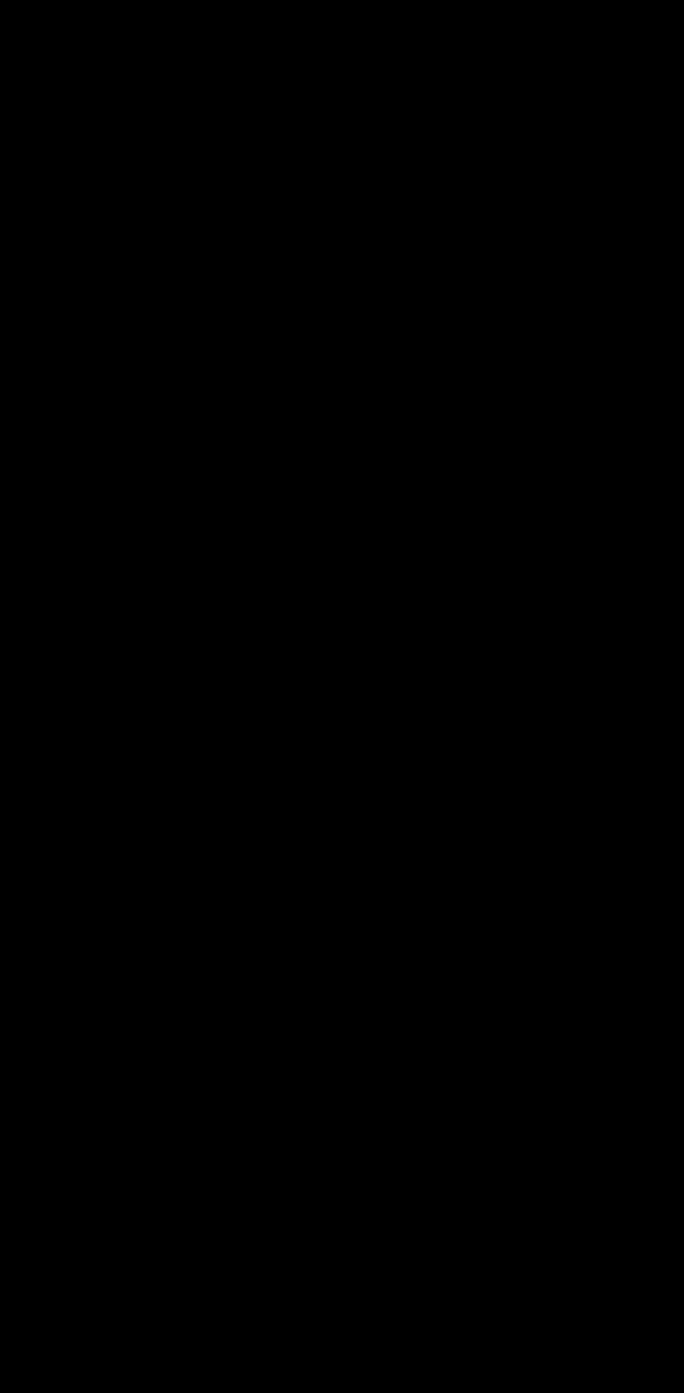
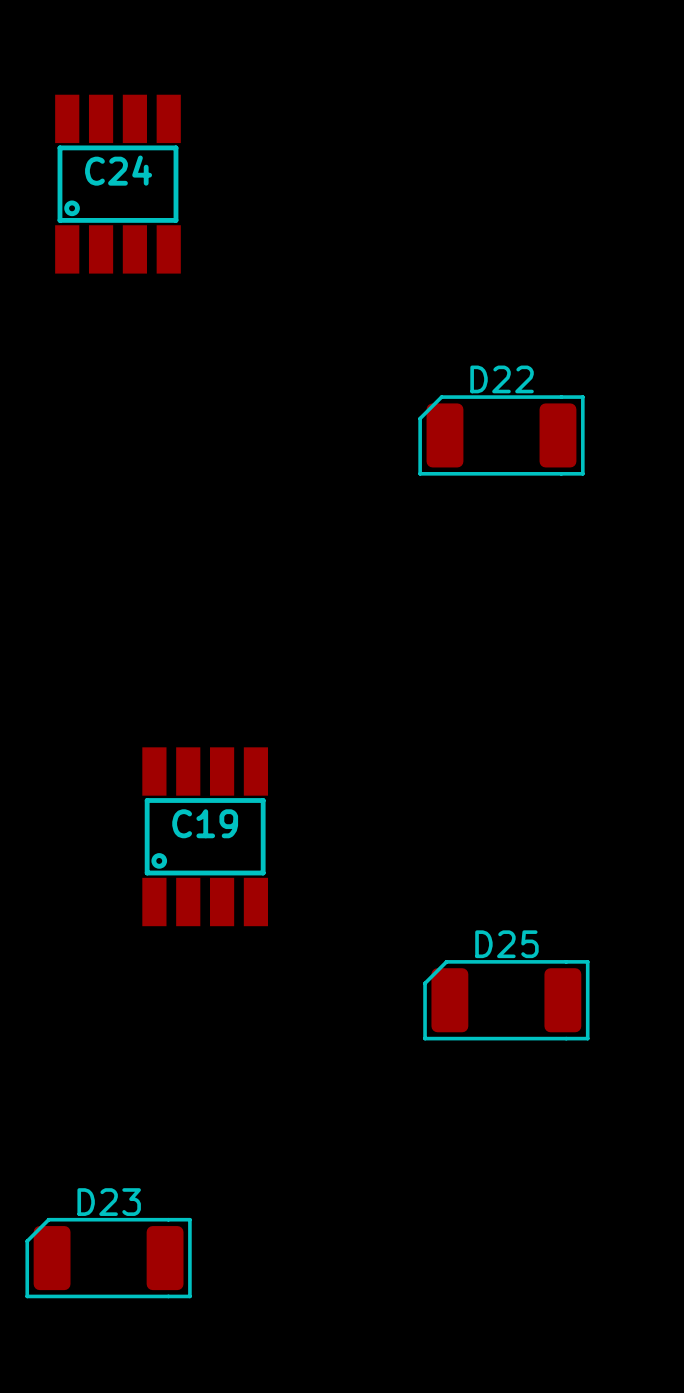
C24: none -> (117, 184)
D22: none -> (501, 435)
C19: none -> (205, 836)
D25: none -> (506, 1000)
D23: none -> (108, 1258)

